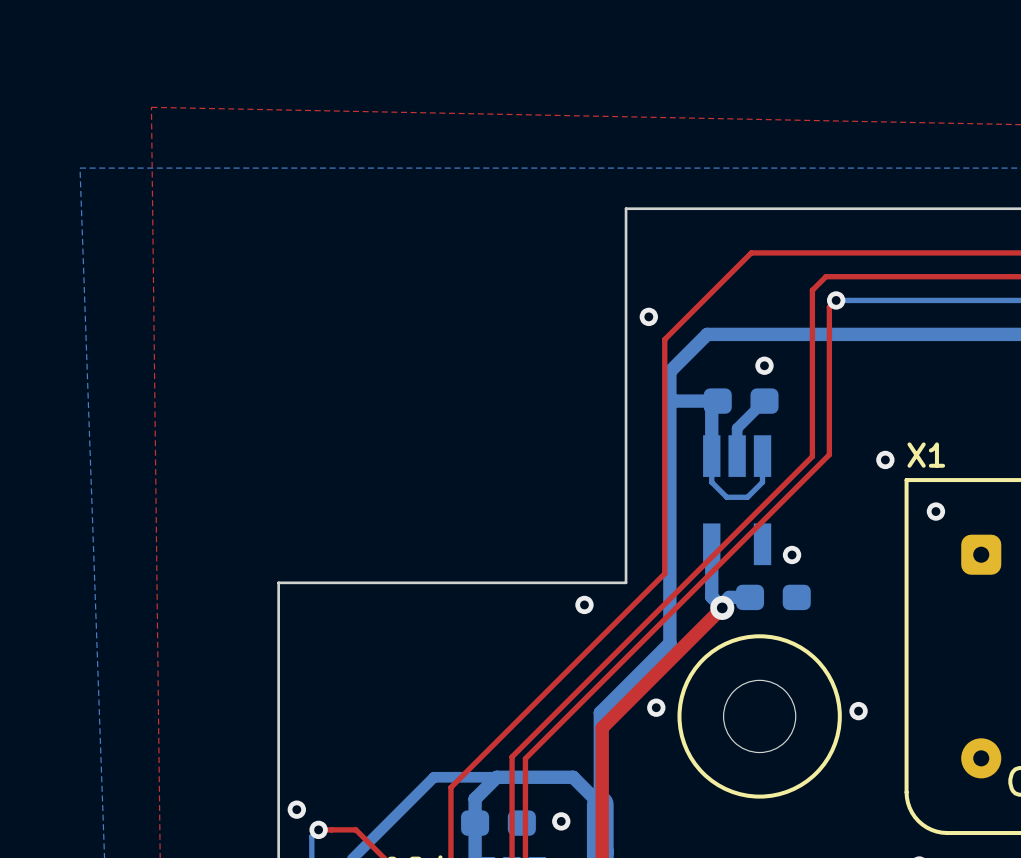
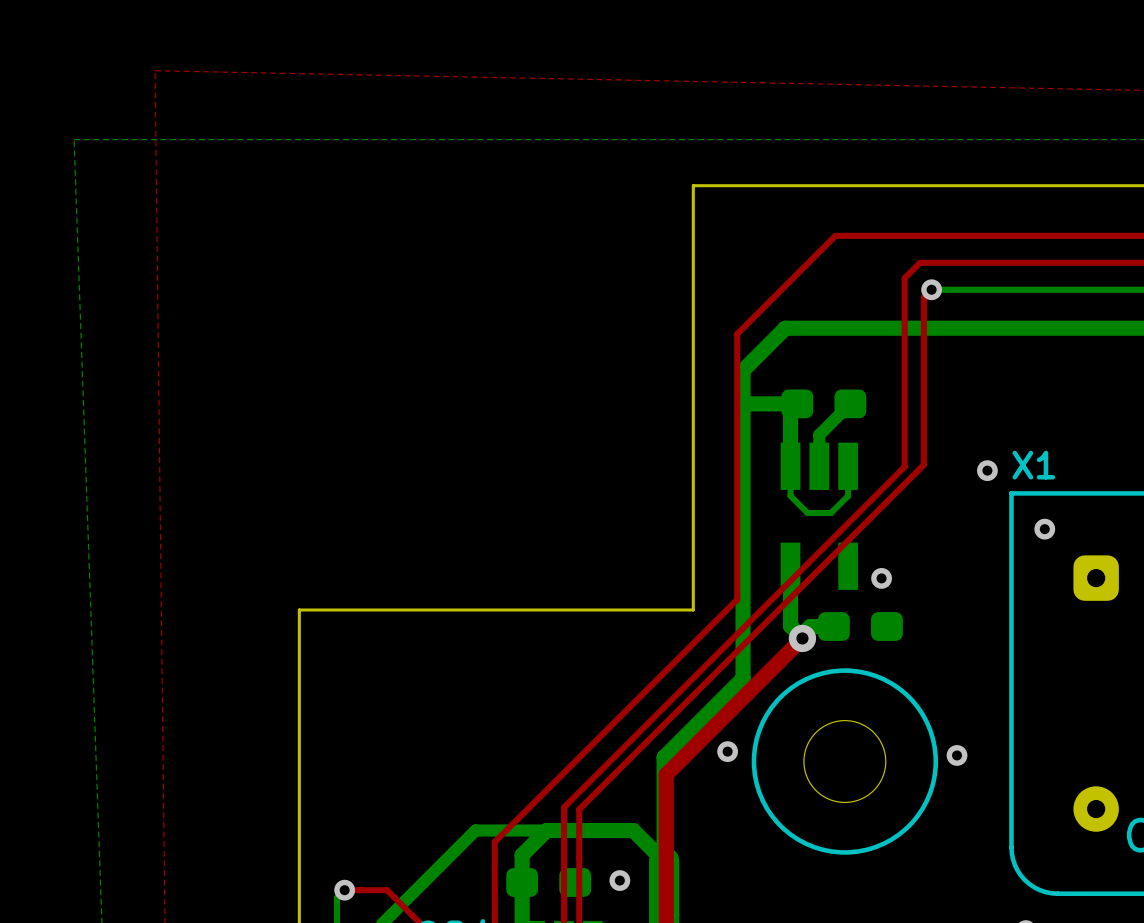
via: (648, 316) -> none
via: (764, 365) -> none
via: (584, 604) -> none
via: (296, 809) -> none

